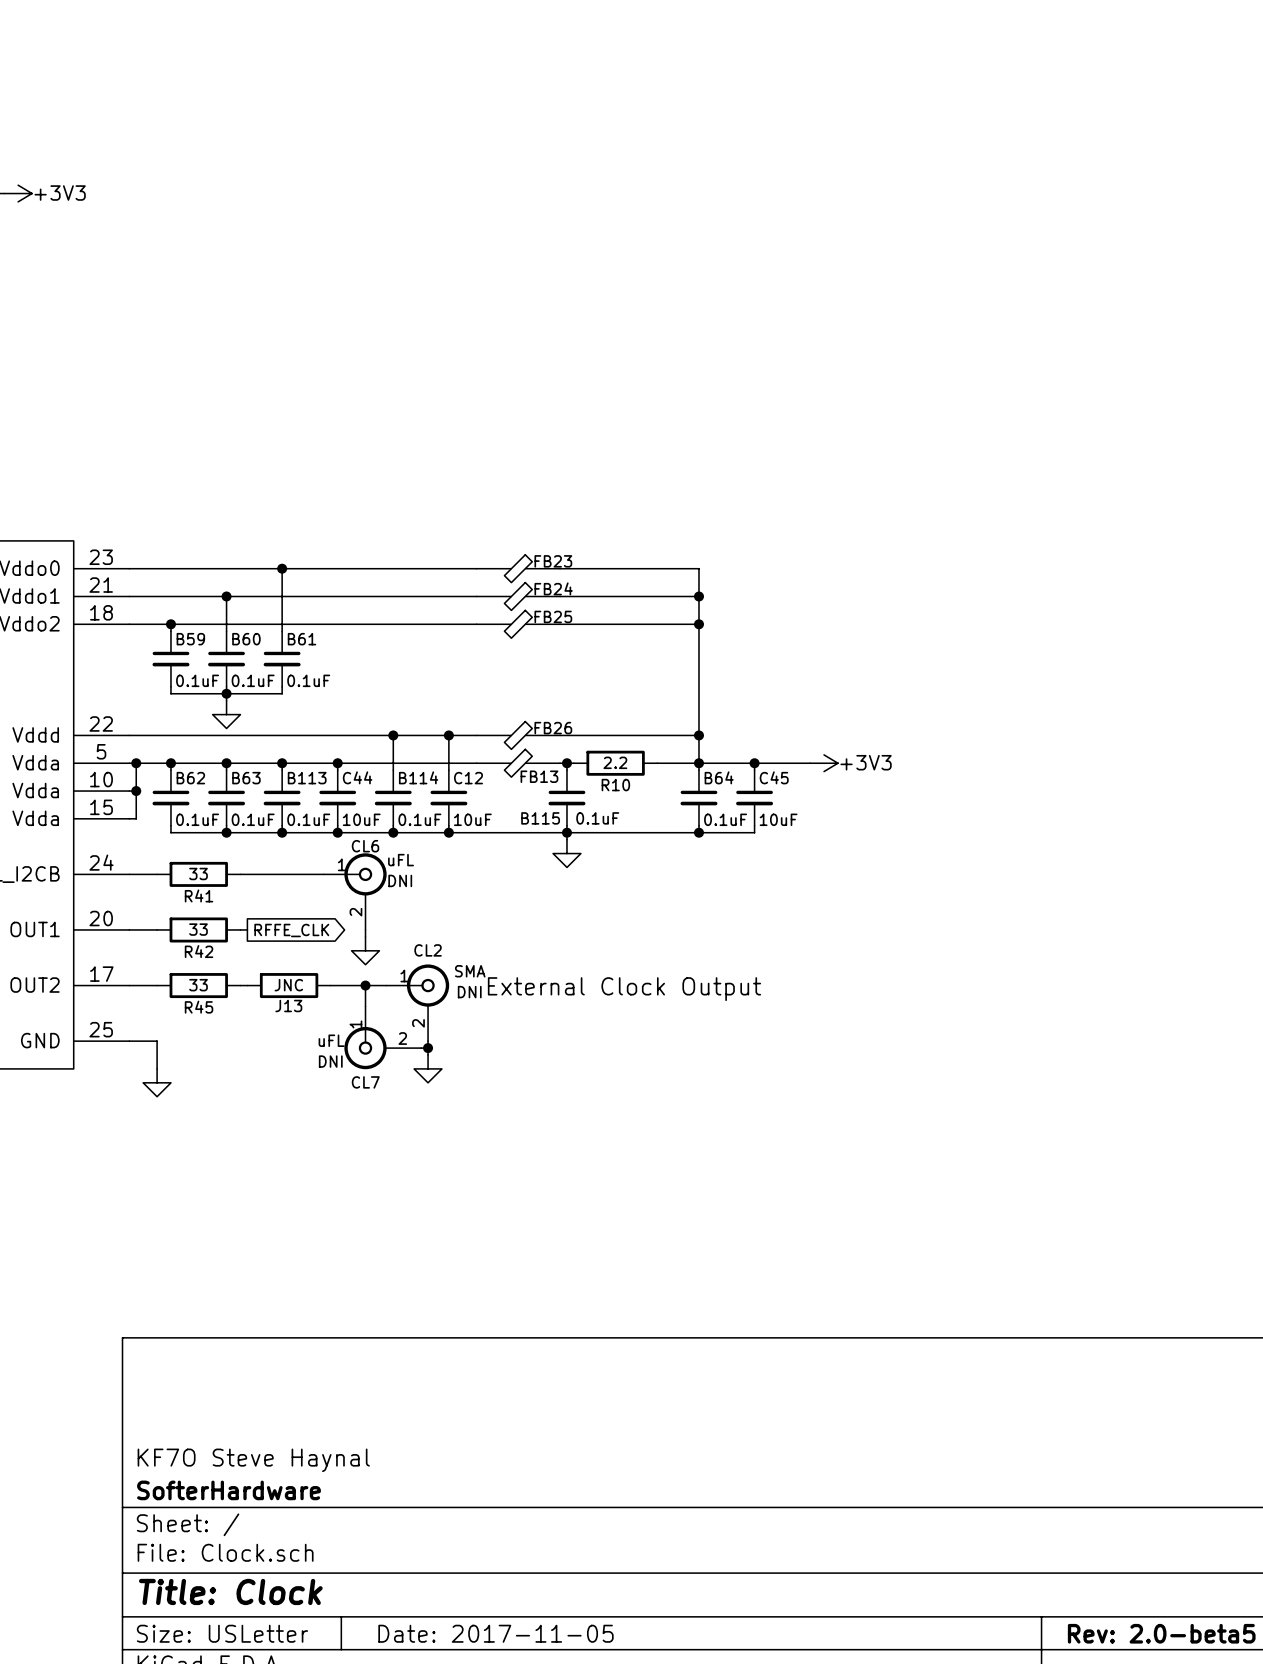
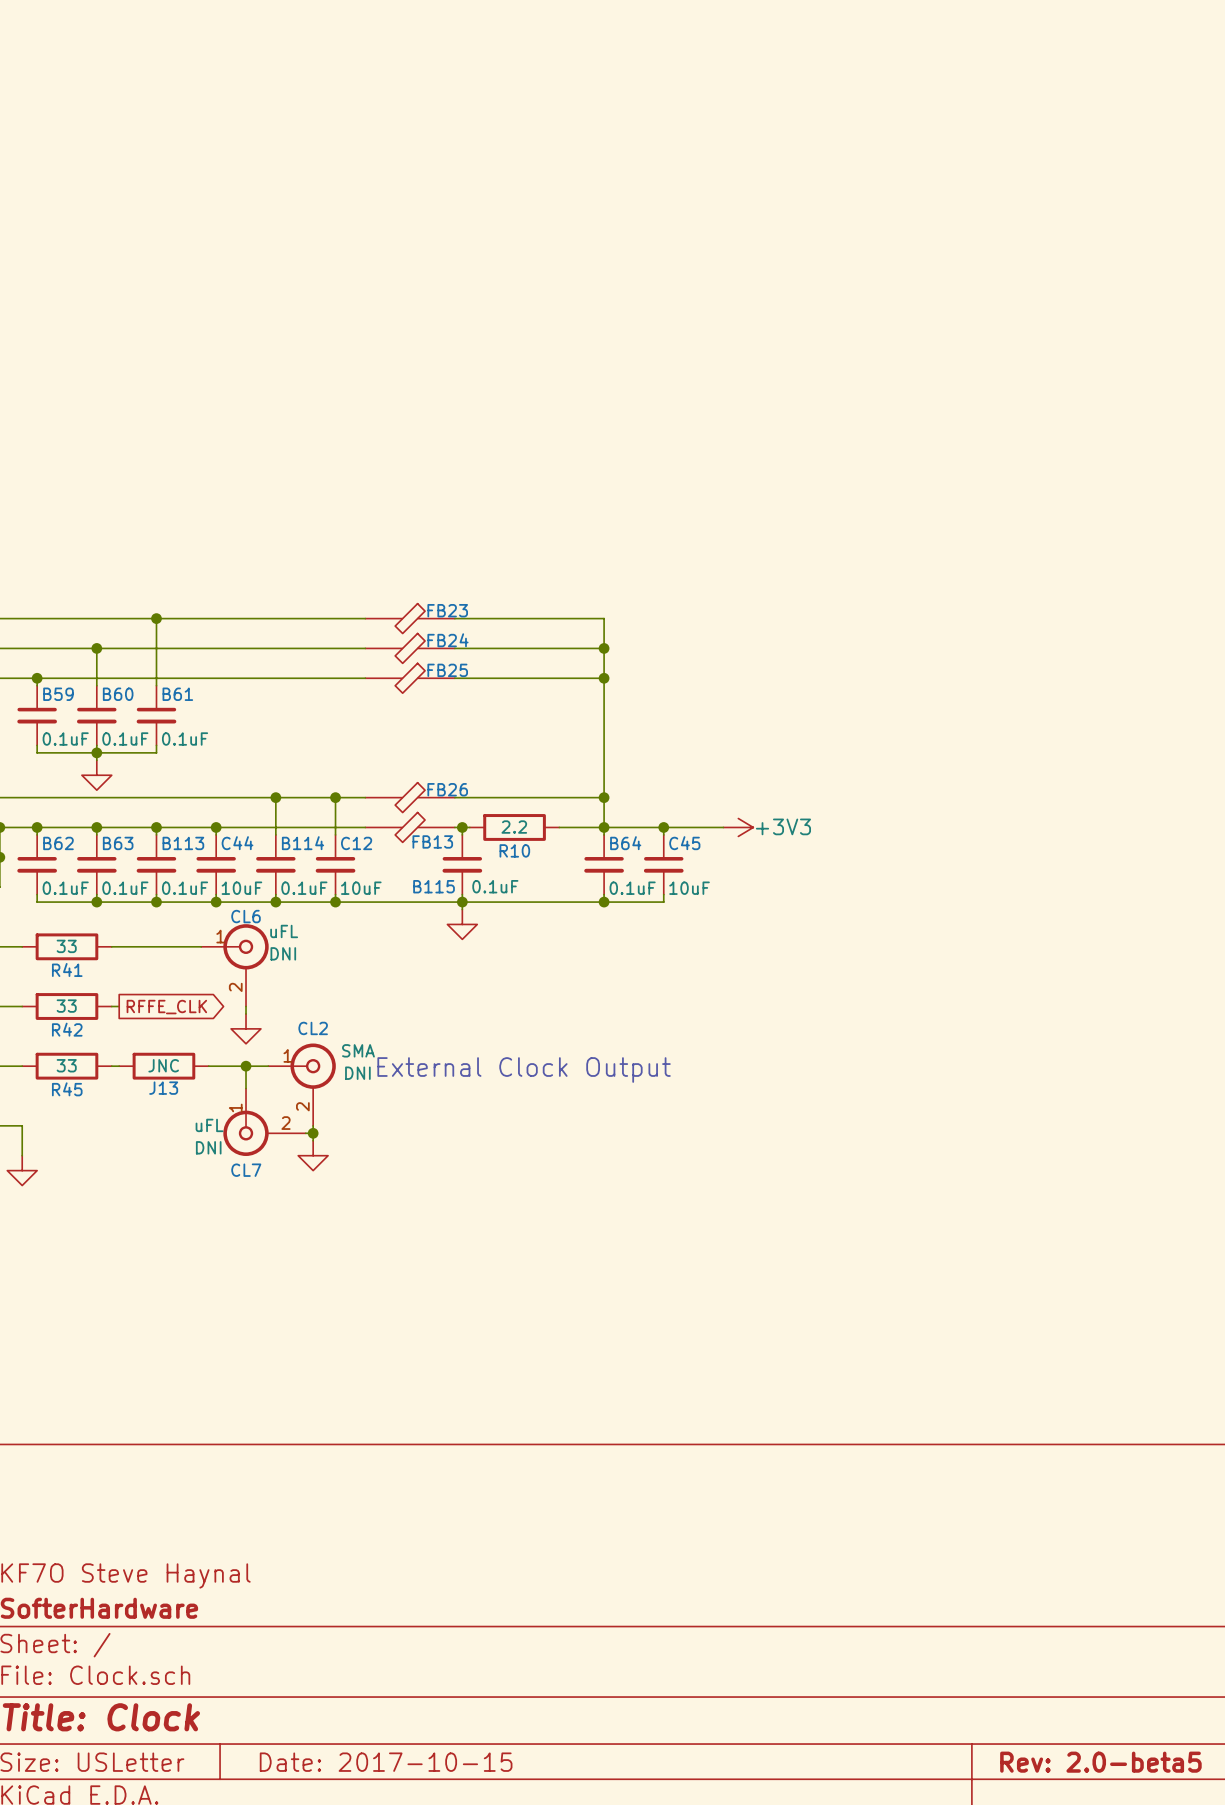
title block: Date: 2017-11-05 (495, 1633) -> Date: 2017-10-15 (386, 1762)

